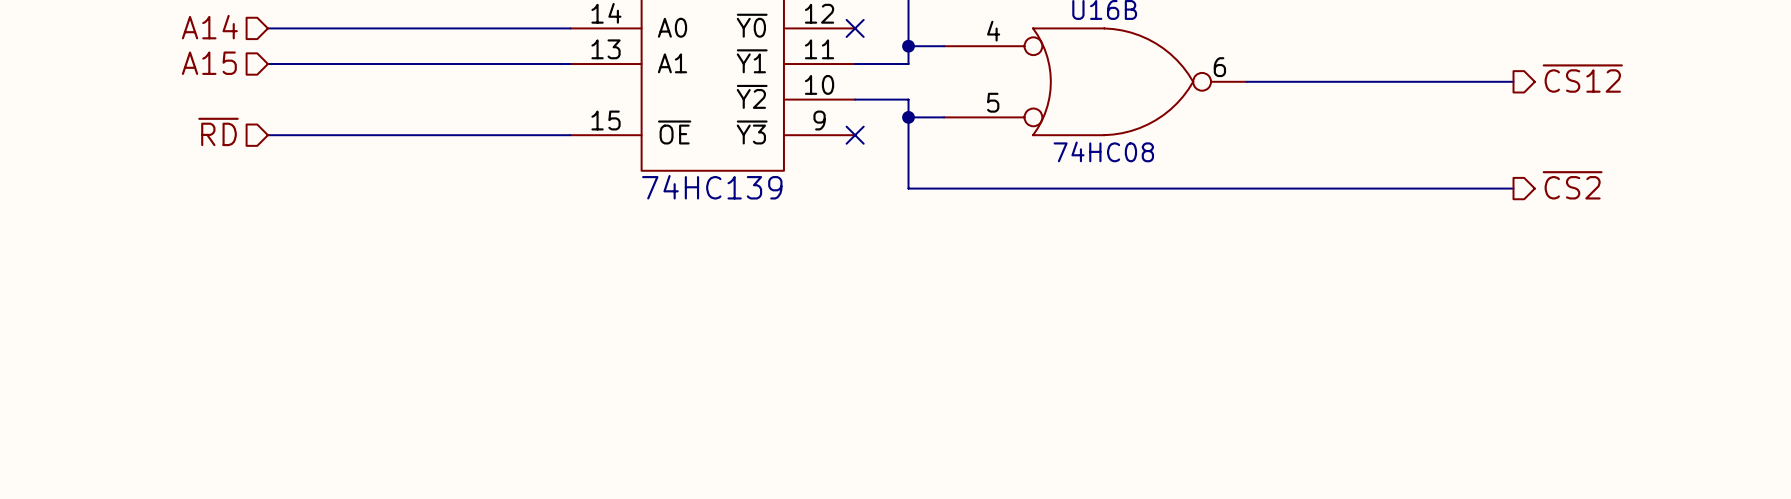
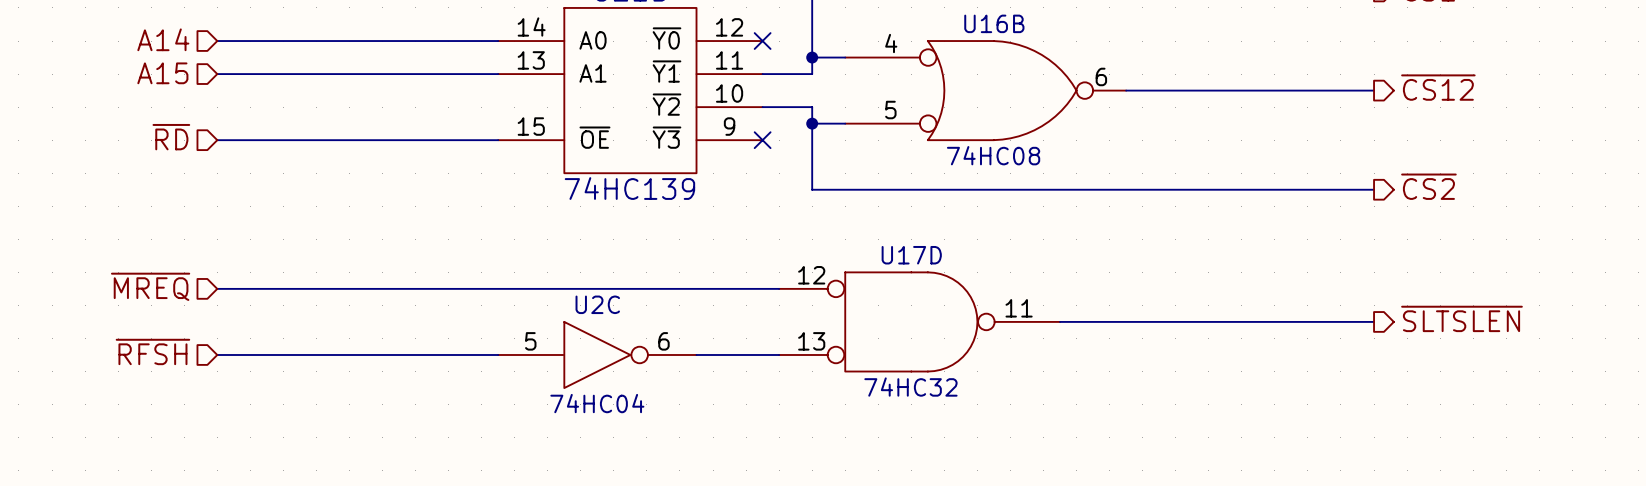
hierarchical label: none -> ~{MREQ} (150, 286)
wire: none -> (217, 288) (779, 288)
hierarchical label: none -> ~{SLTSLEN} (1461, 318)
U17D: none -> 74HC32 (919, 321)
wire: none -> (1060, 321) (1374, 321)
hierarchical label: none -> ~{RFSH} (152, 351)
wire: none -> (217, 354) (498, 354)
U2C: none -> 74HC04 (597, 354)
wire: none -> (696, 354) (779, 354)

